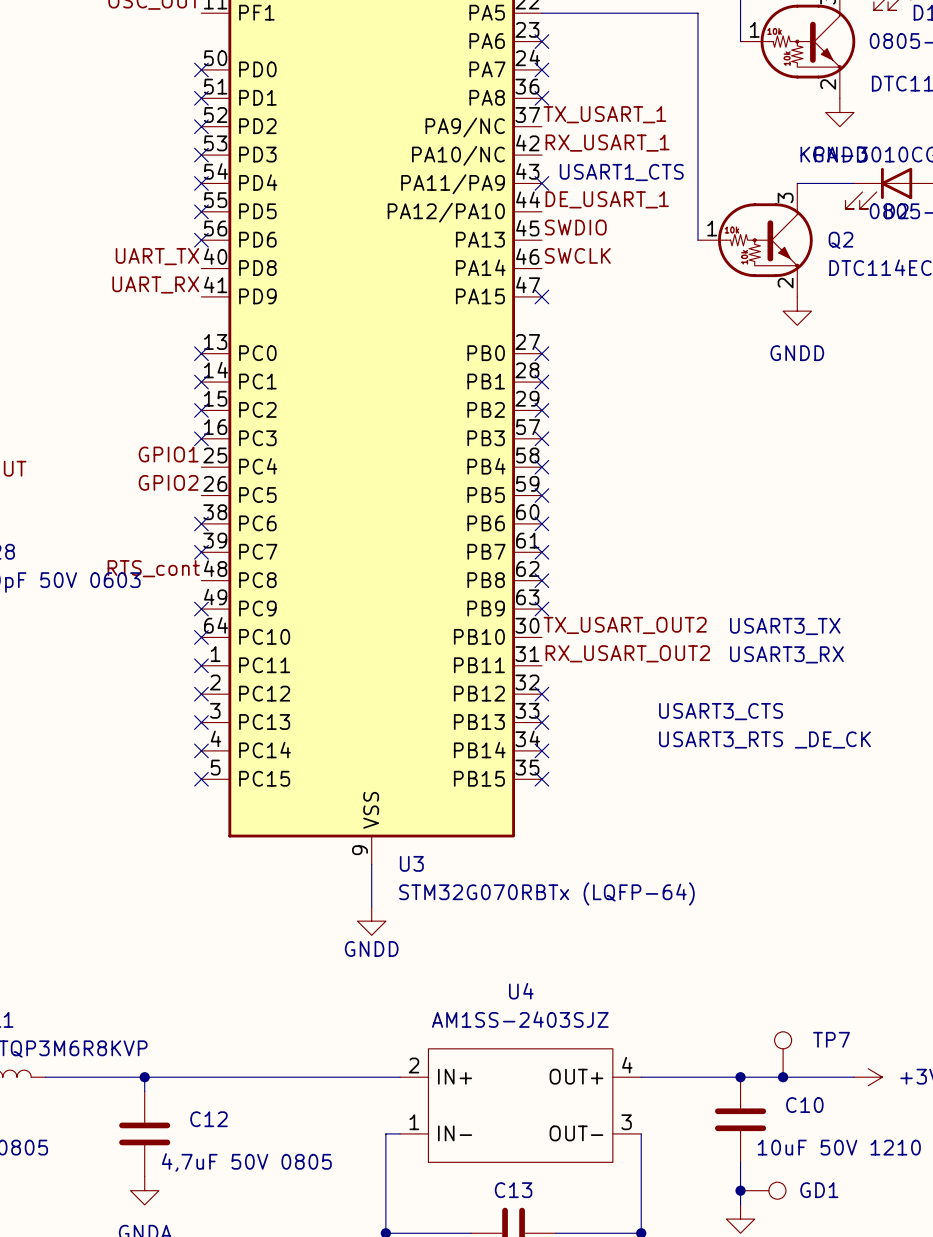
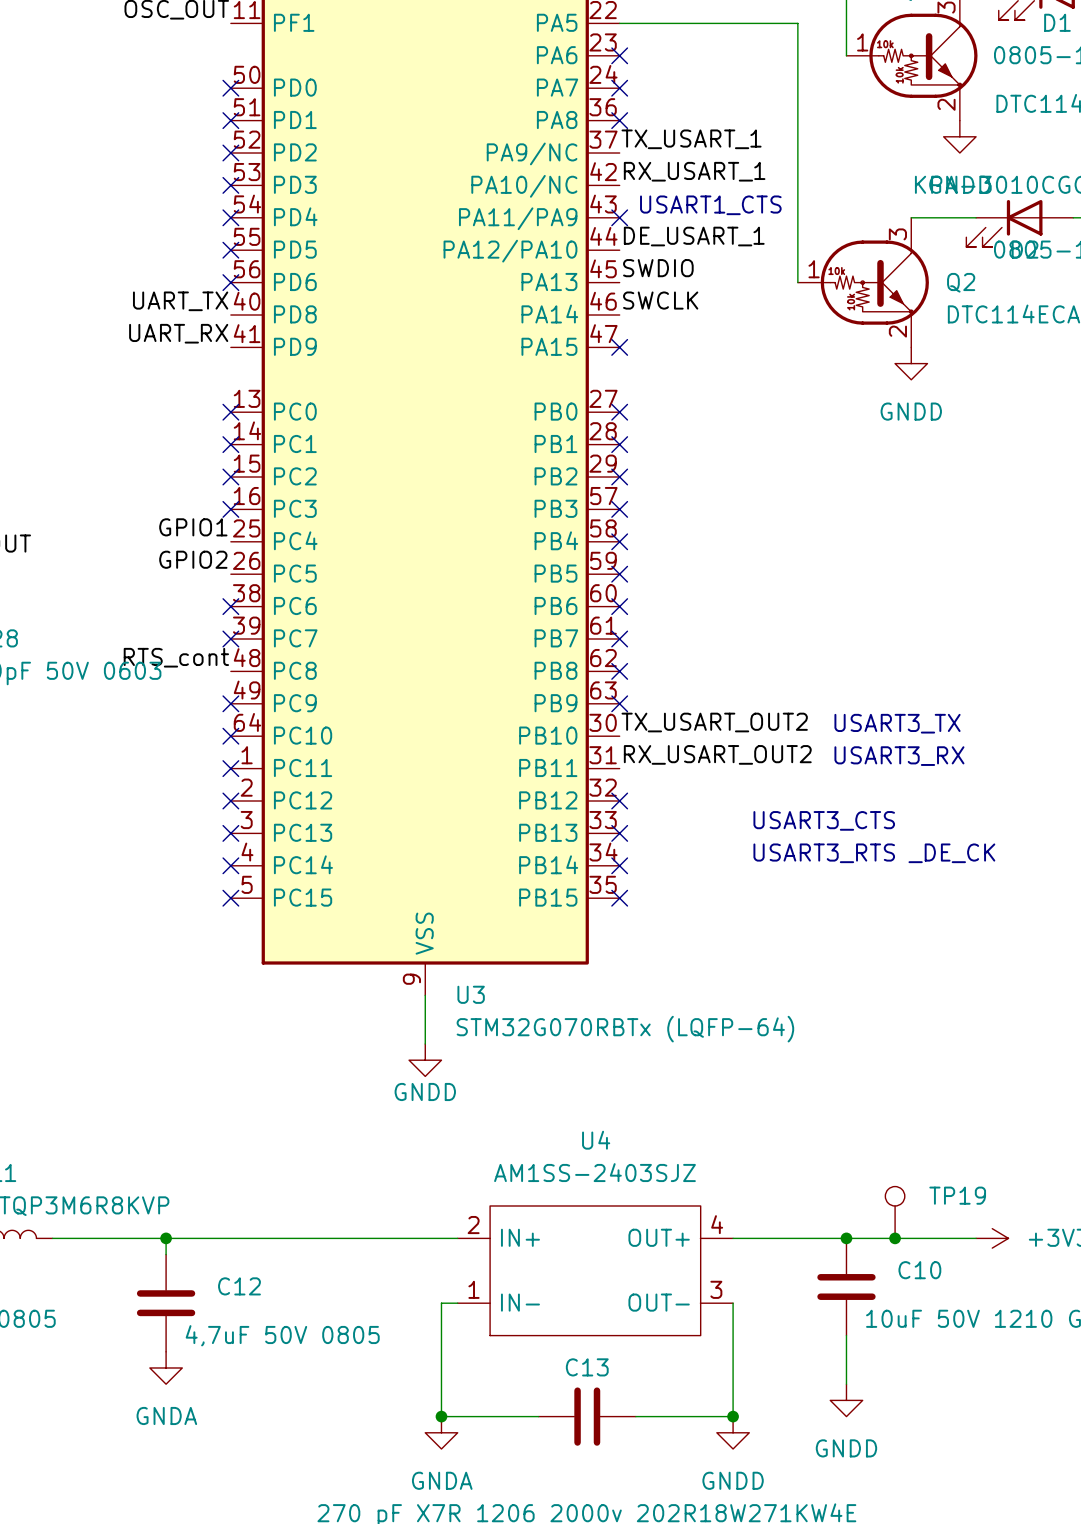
TP7 name: TP7 (831, 1039) -> TP19 (957, 1195)
junction: (740, 1190) -> none
GD1: (763, 1190) -> none

